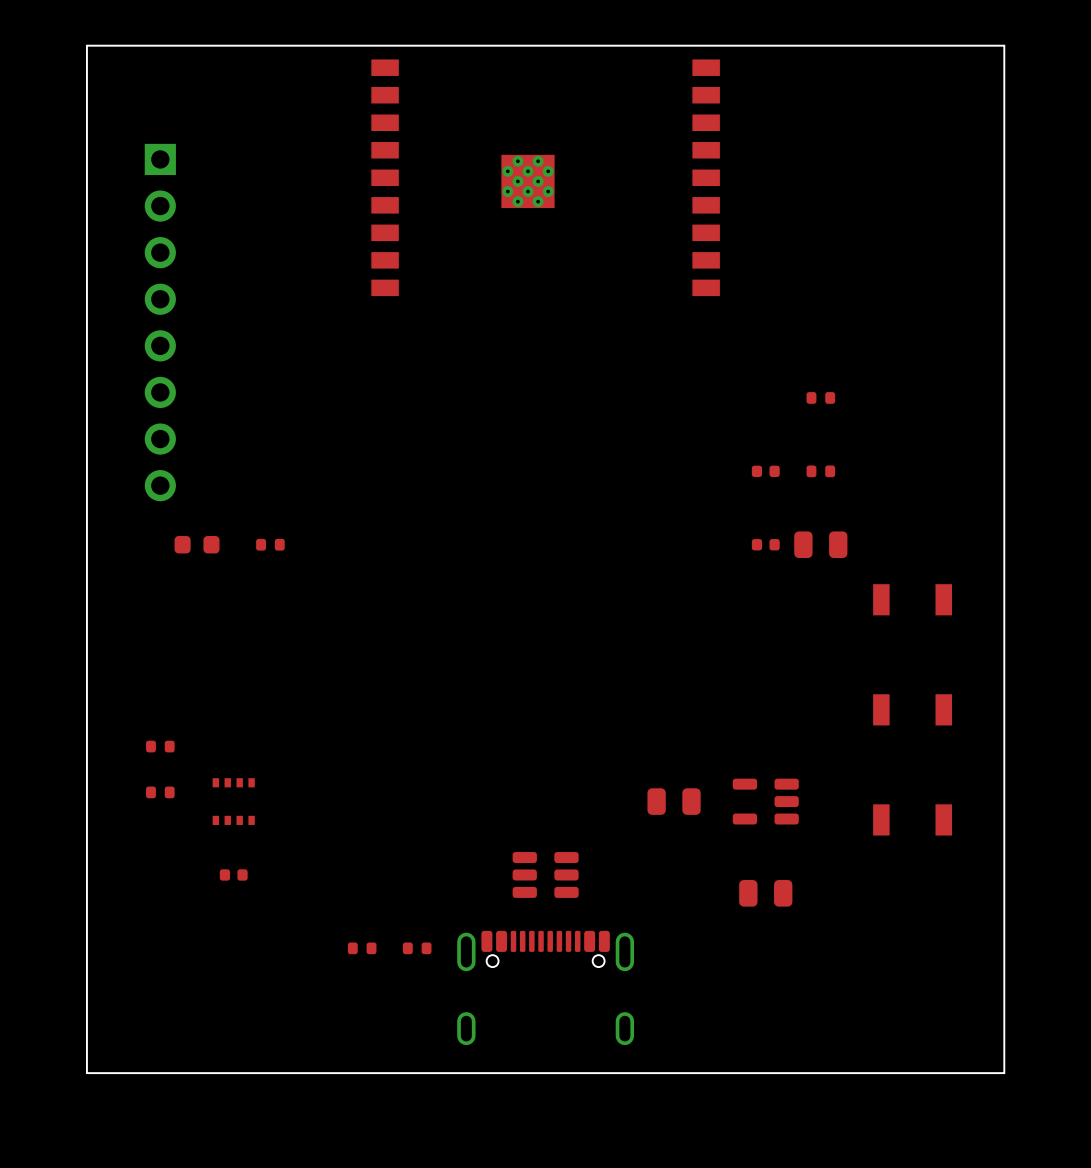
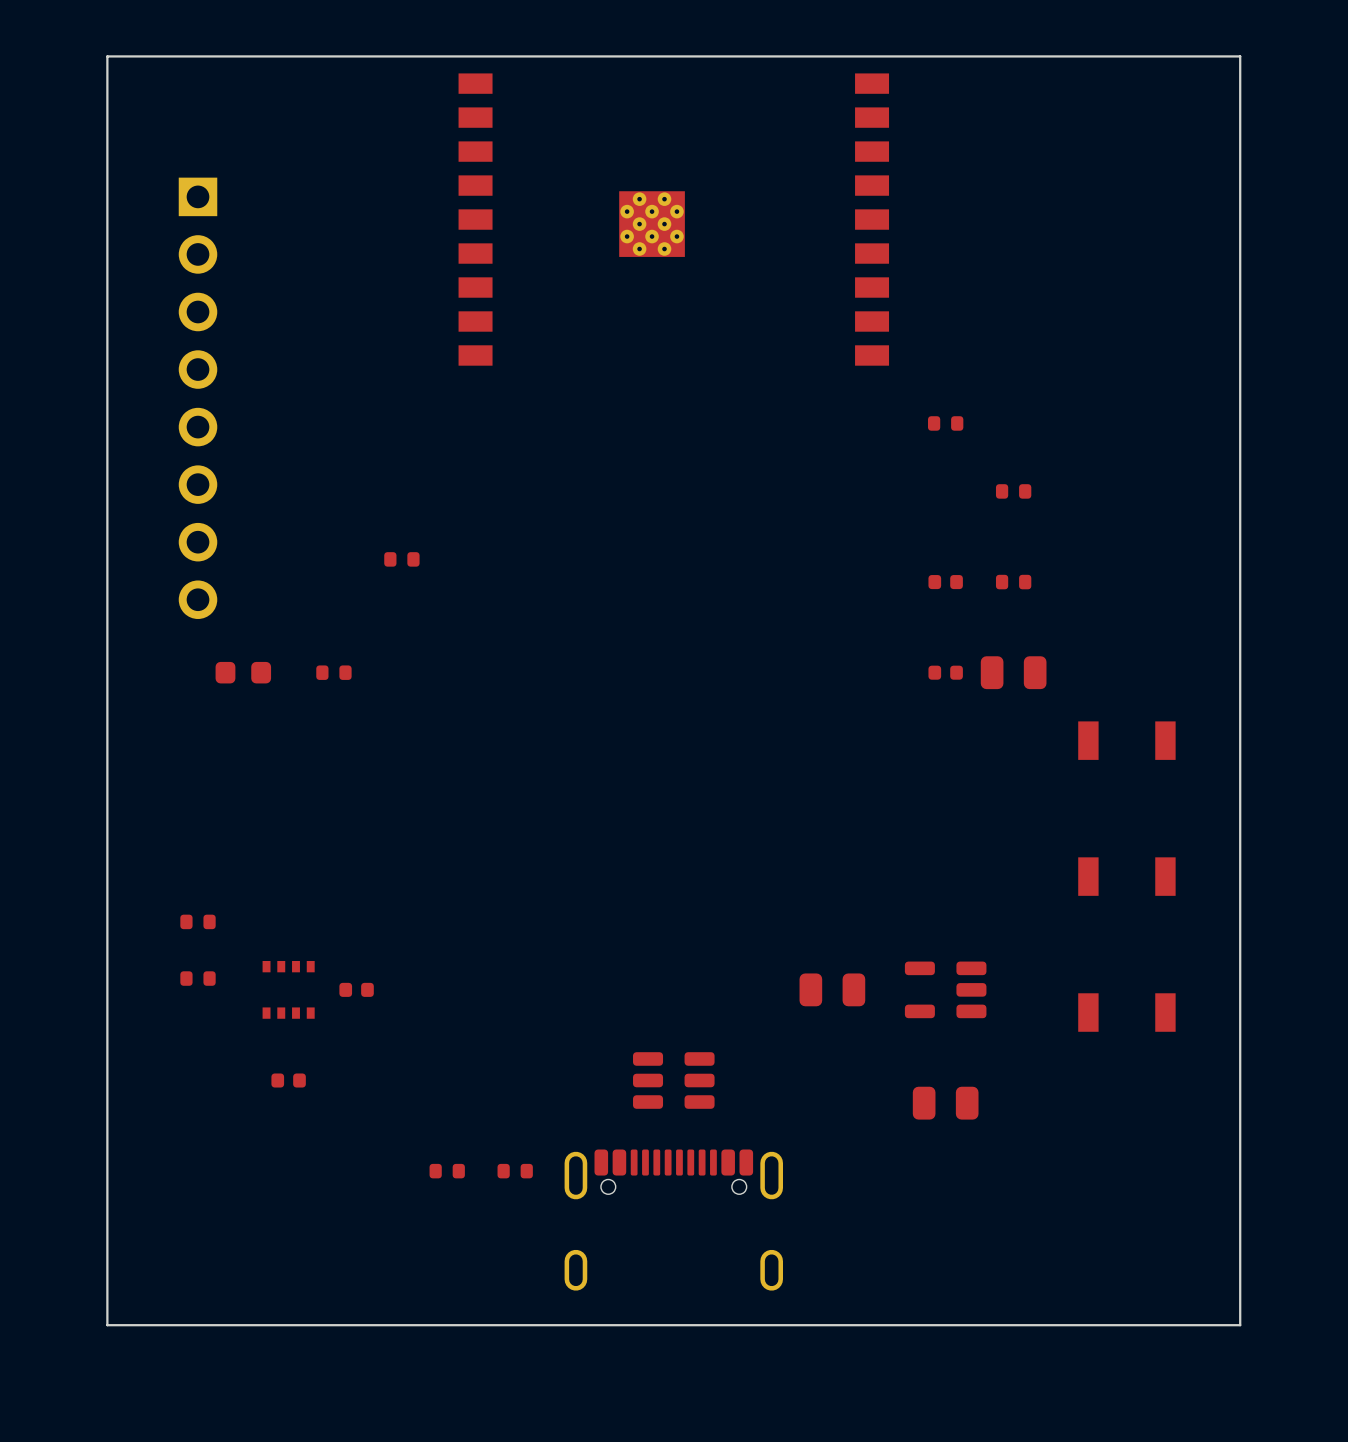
part: none -> (945, 423)
part: none -> (401, 559)
part: none -> (356, 989)

